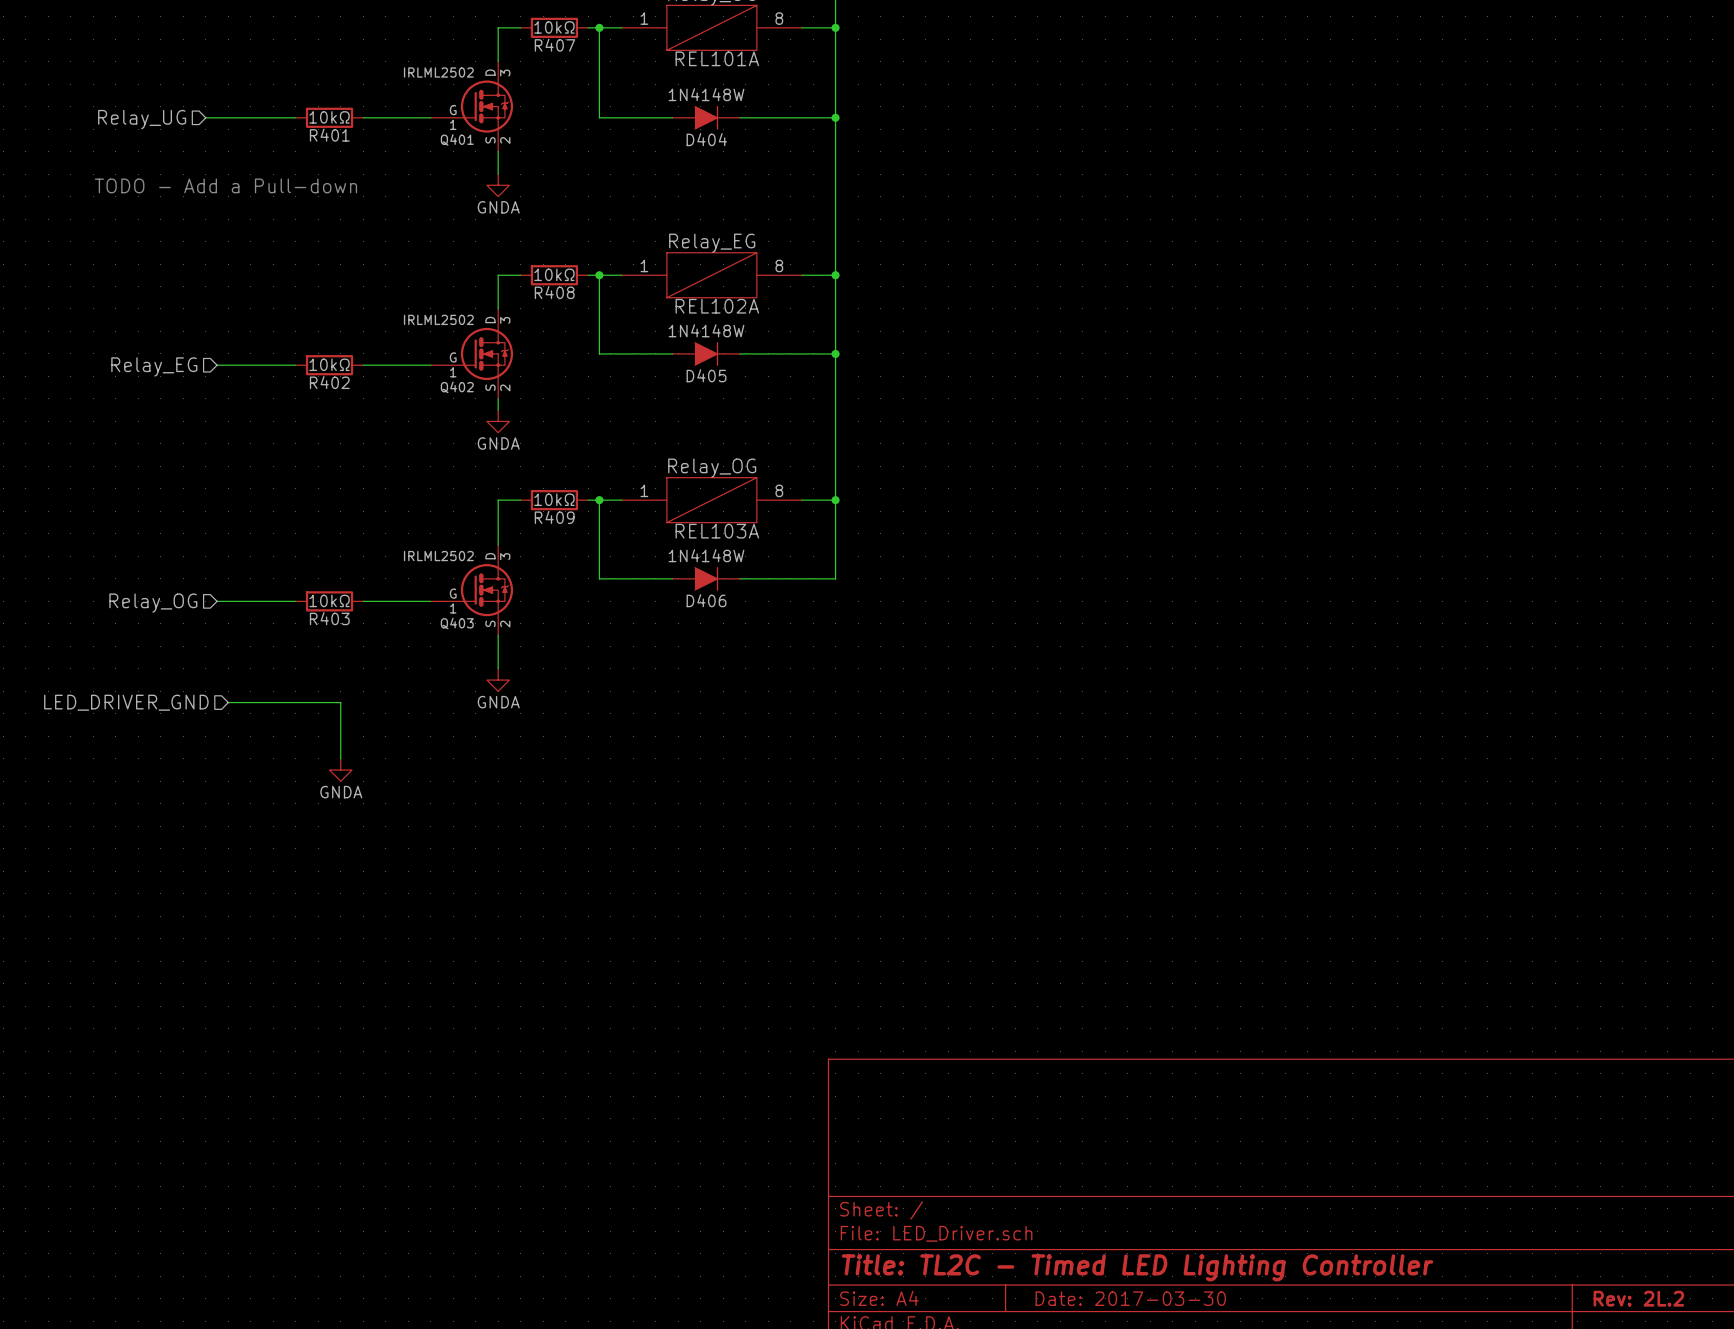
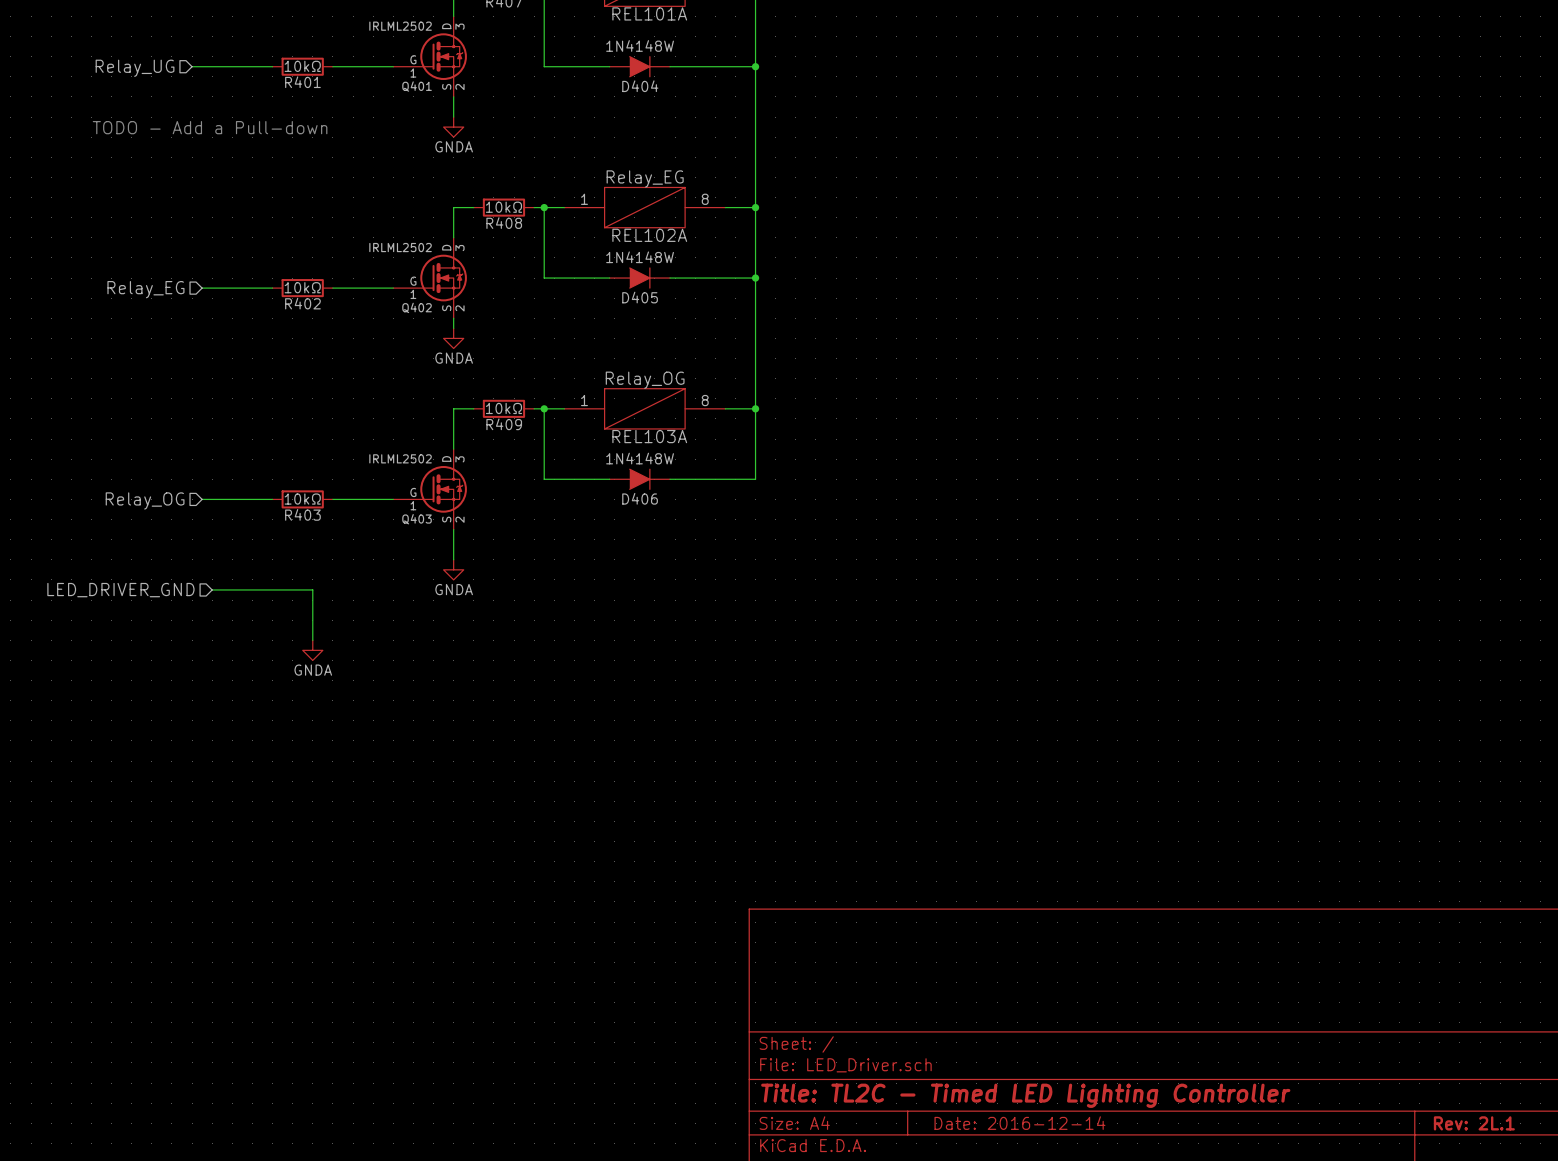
title block: Date: 2017-03-30 (1130, 1298) -> Date: 2016-12-14 (1019, 1123)
title block: Rev: 2L.2 (1638, 1298) -> Rev: 2L.1 (1474, 1123)

